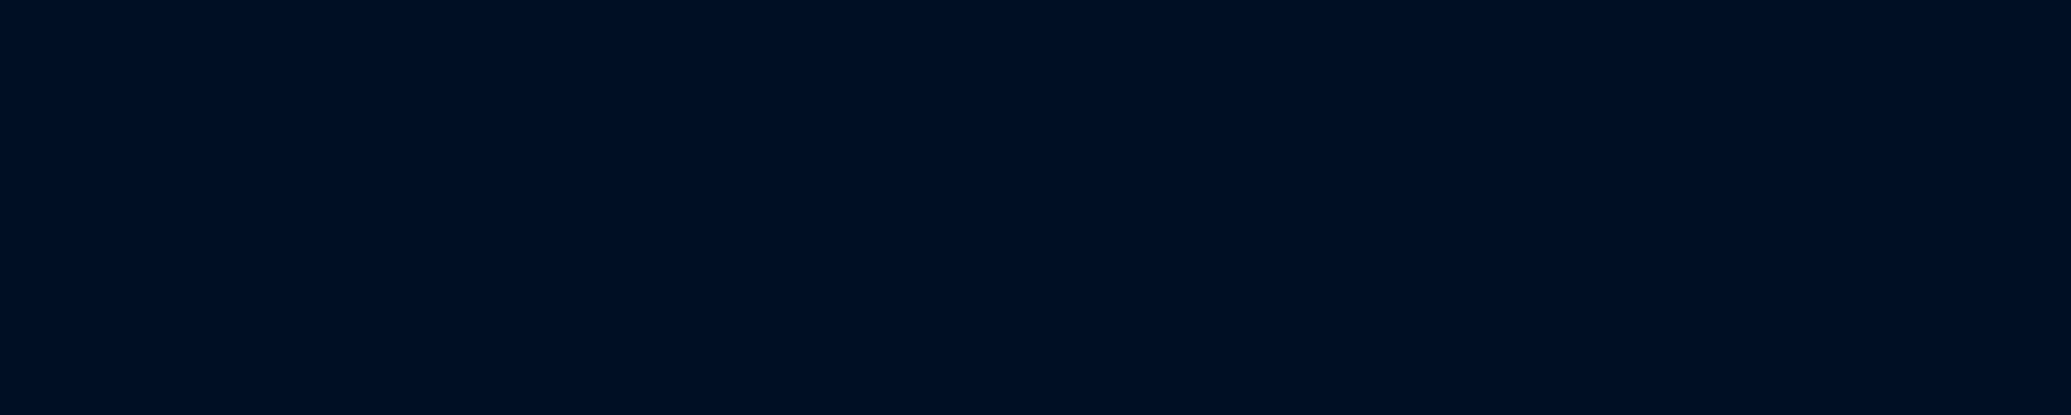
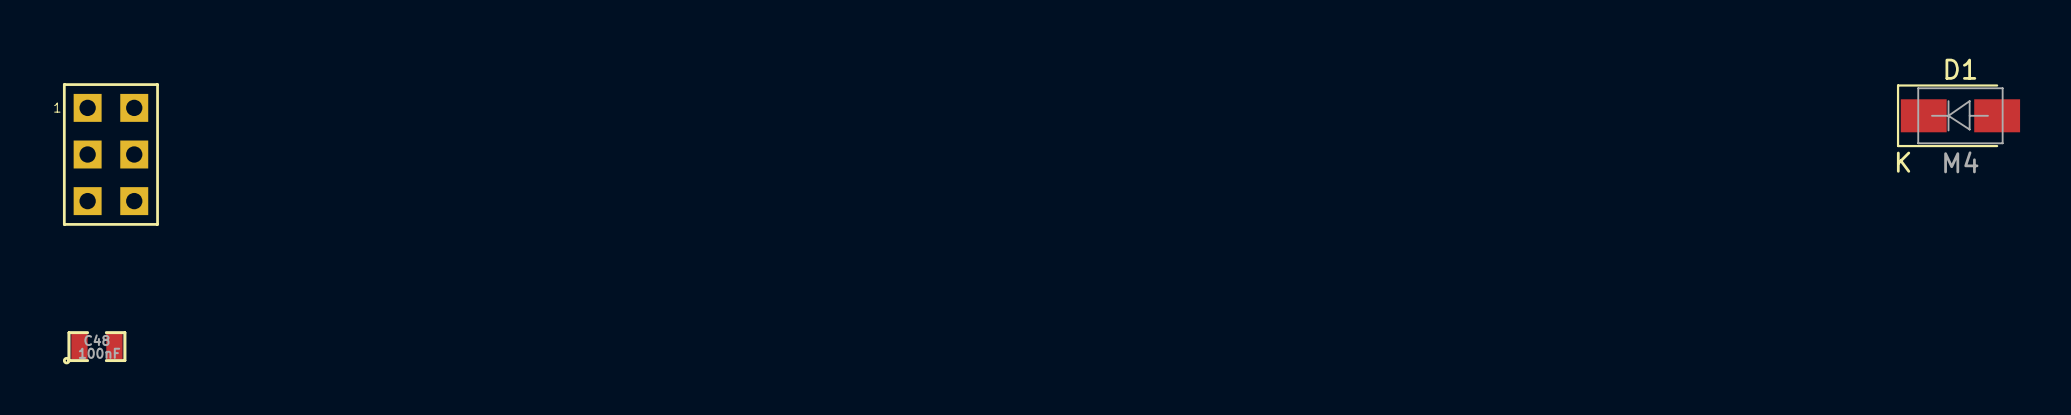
D1: none -> M4 (1958, 115)
part: none -> (110, 154)
C48: none -> 100nF (94, 347)

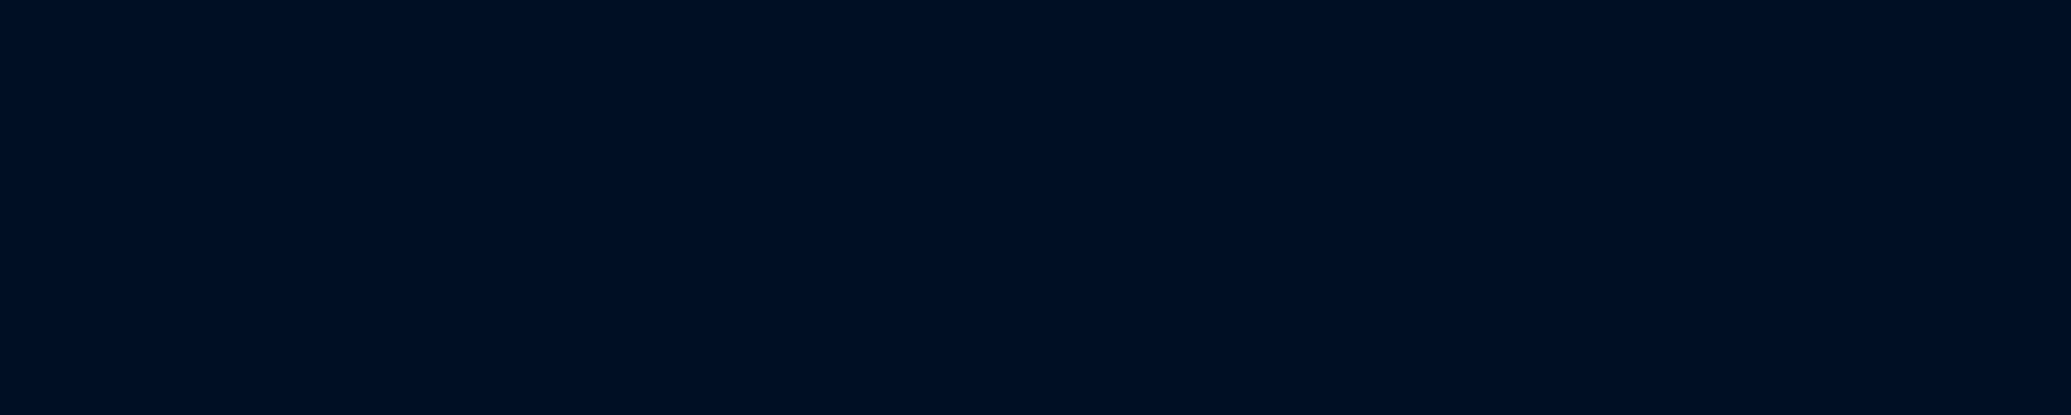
D1: M4 (1958, 115) -> none
part: (110, 154) -> none
C48: 100nF (94, 347) -> none

